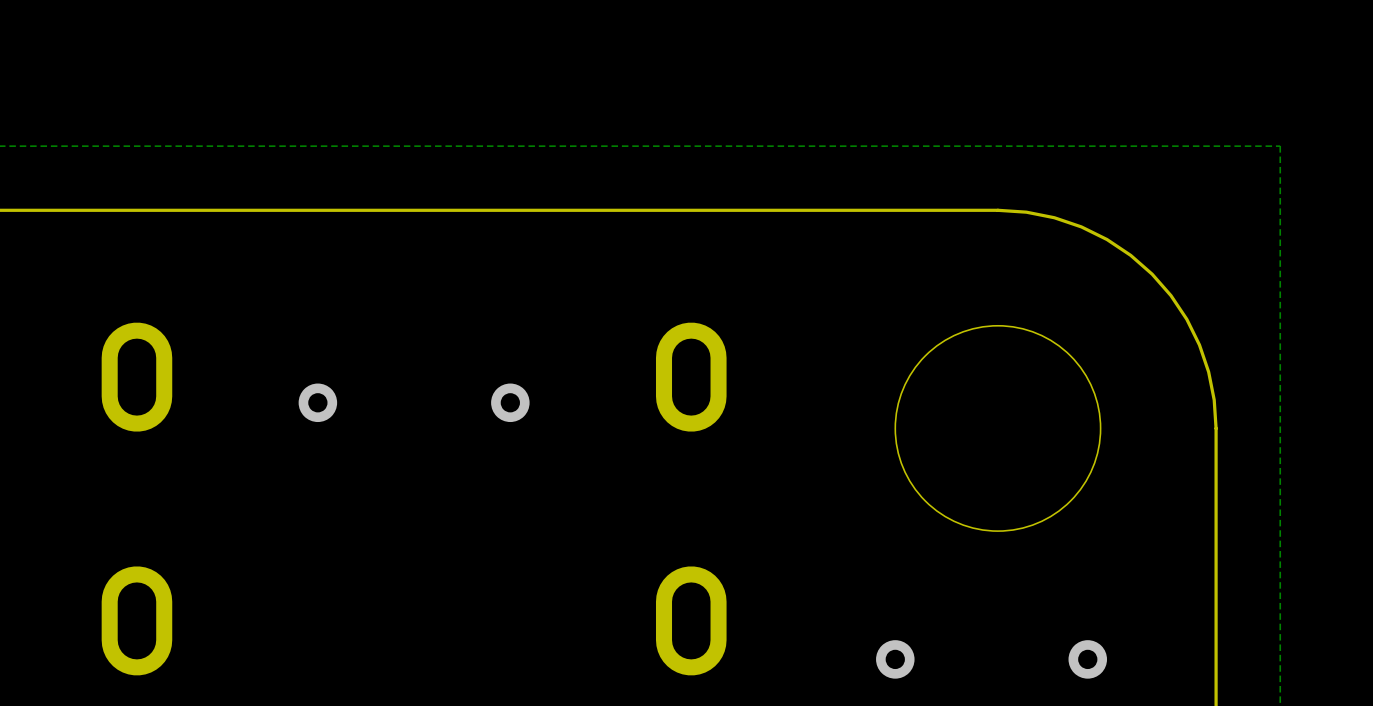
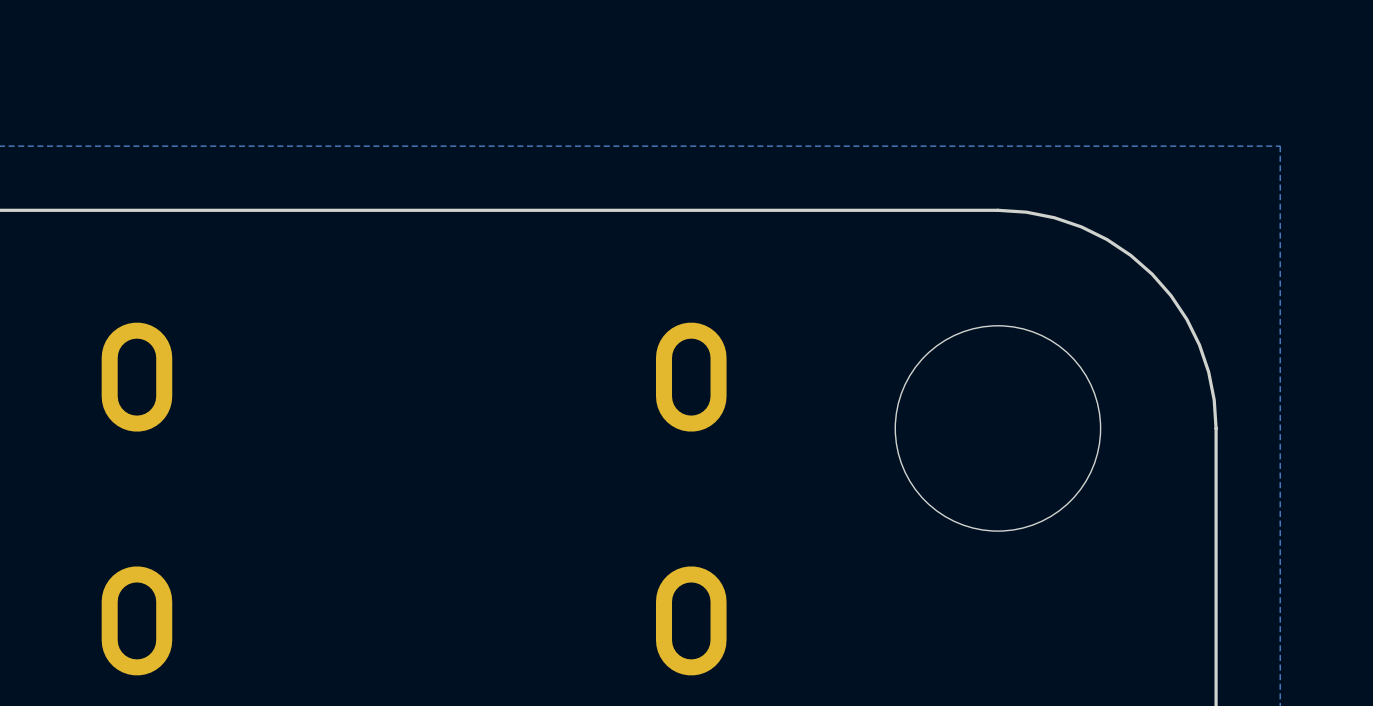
via: (317, 402) -> none
via: (510, 402) -> none
via: (895, 659) -> none
via: (1087, 659) -> none

